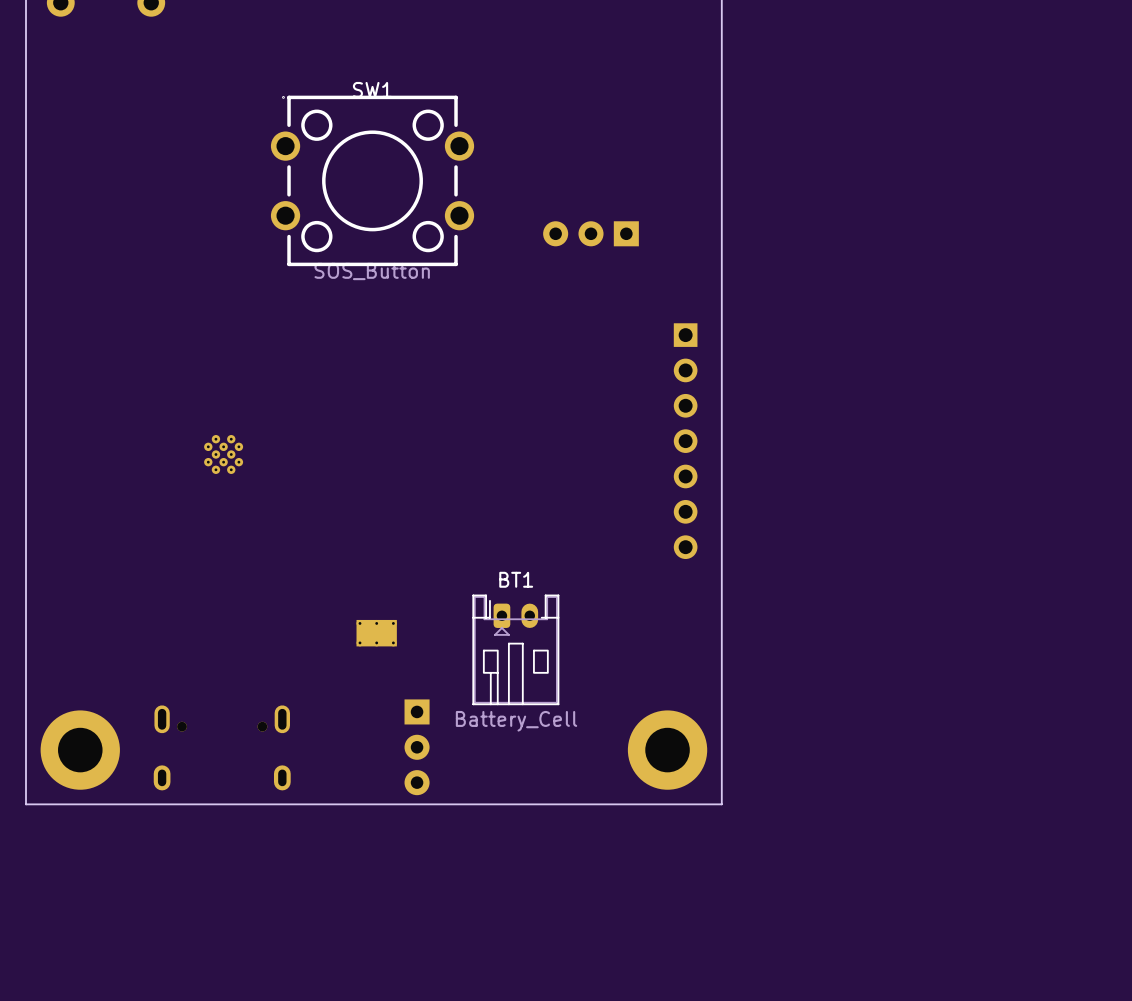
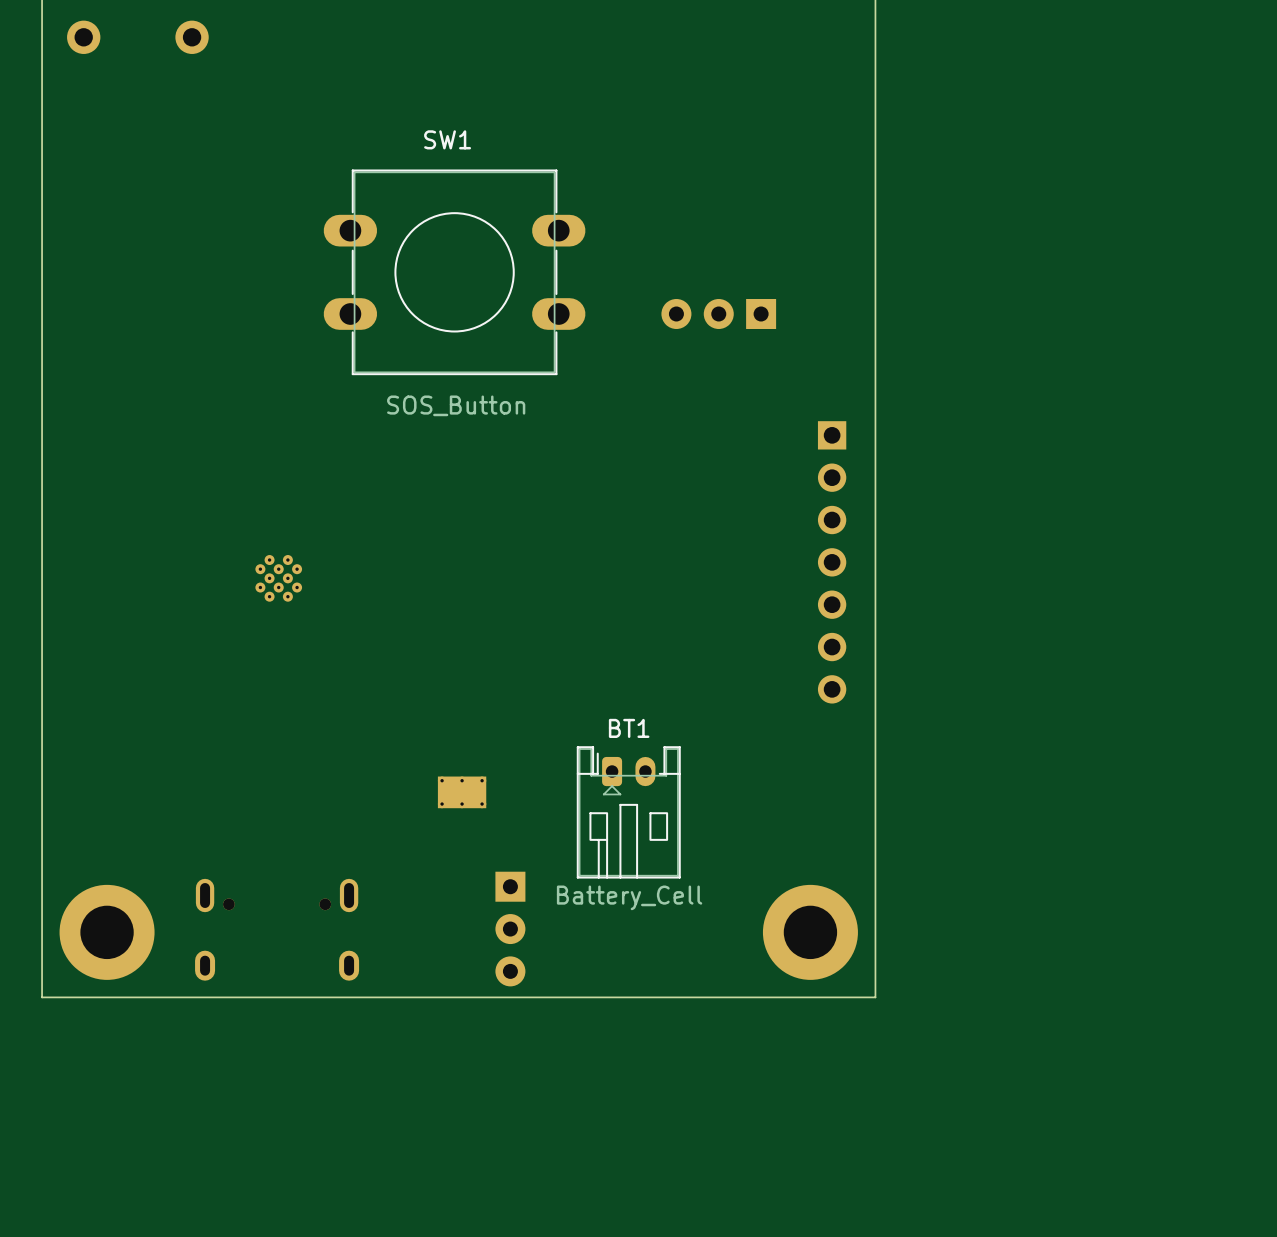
SW1 footprint: [270, 95, 475, 267] -> [323, 169, 586, 376]

